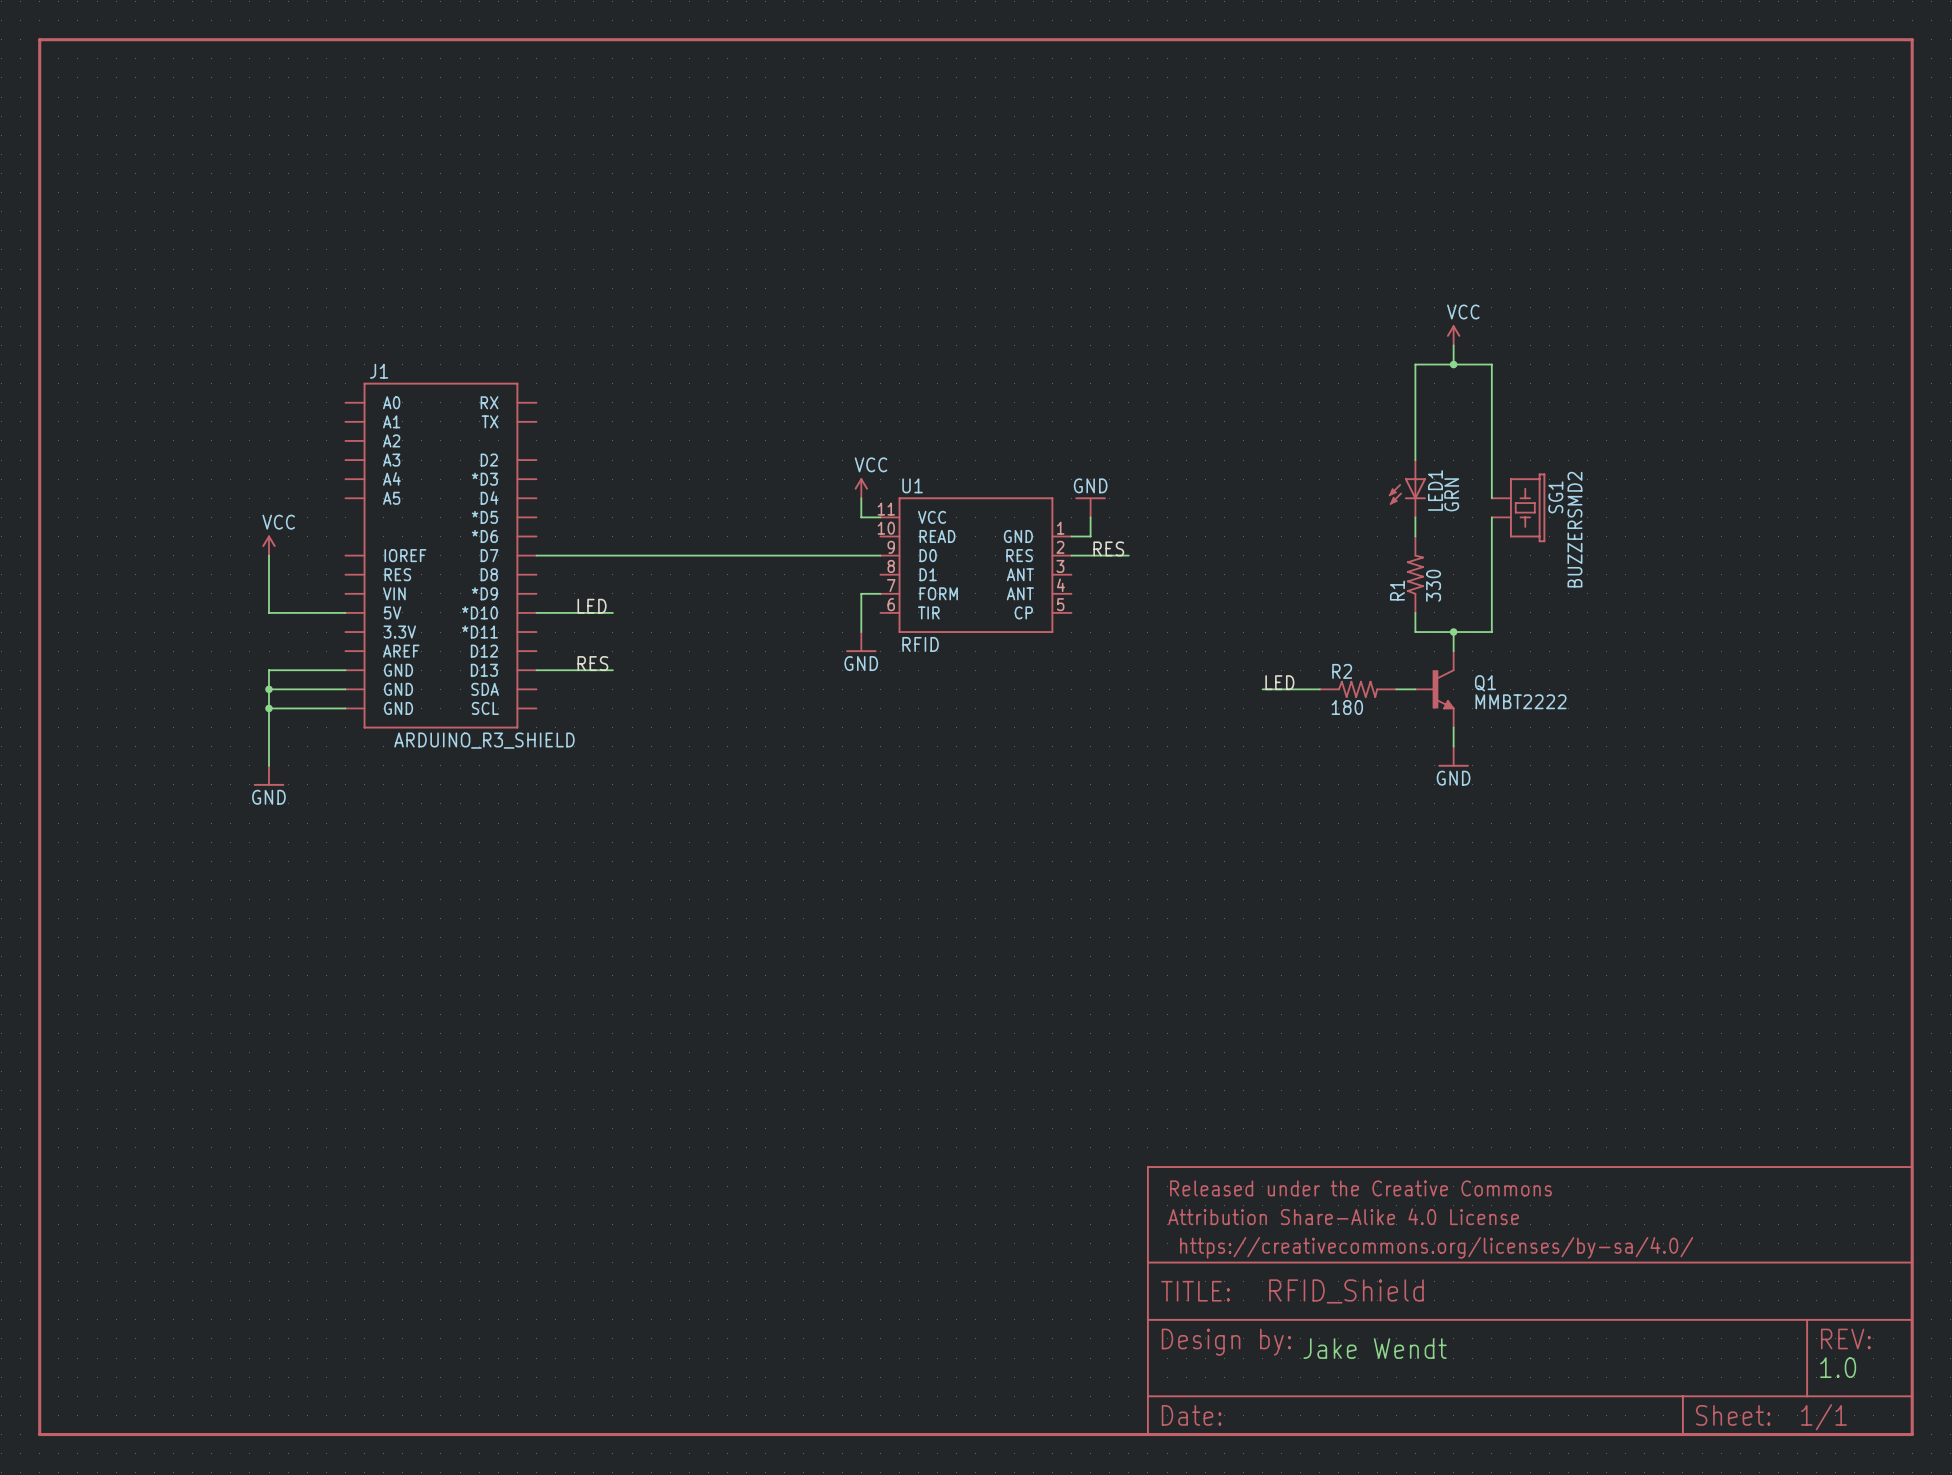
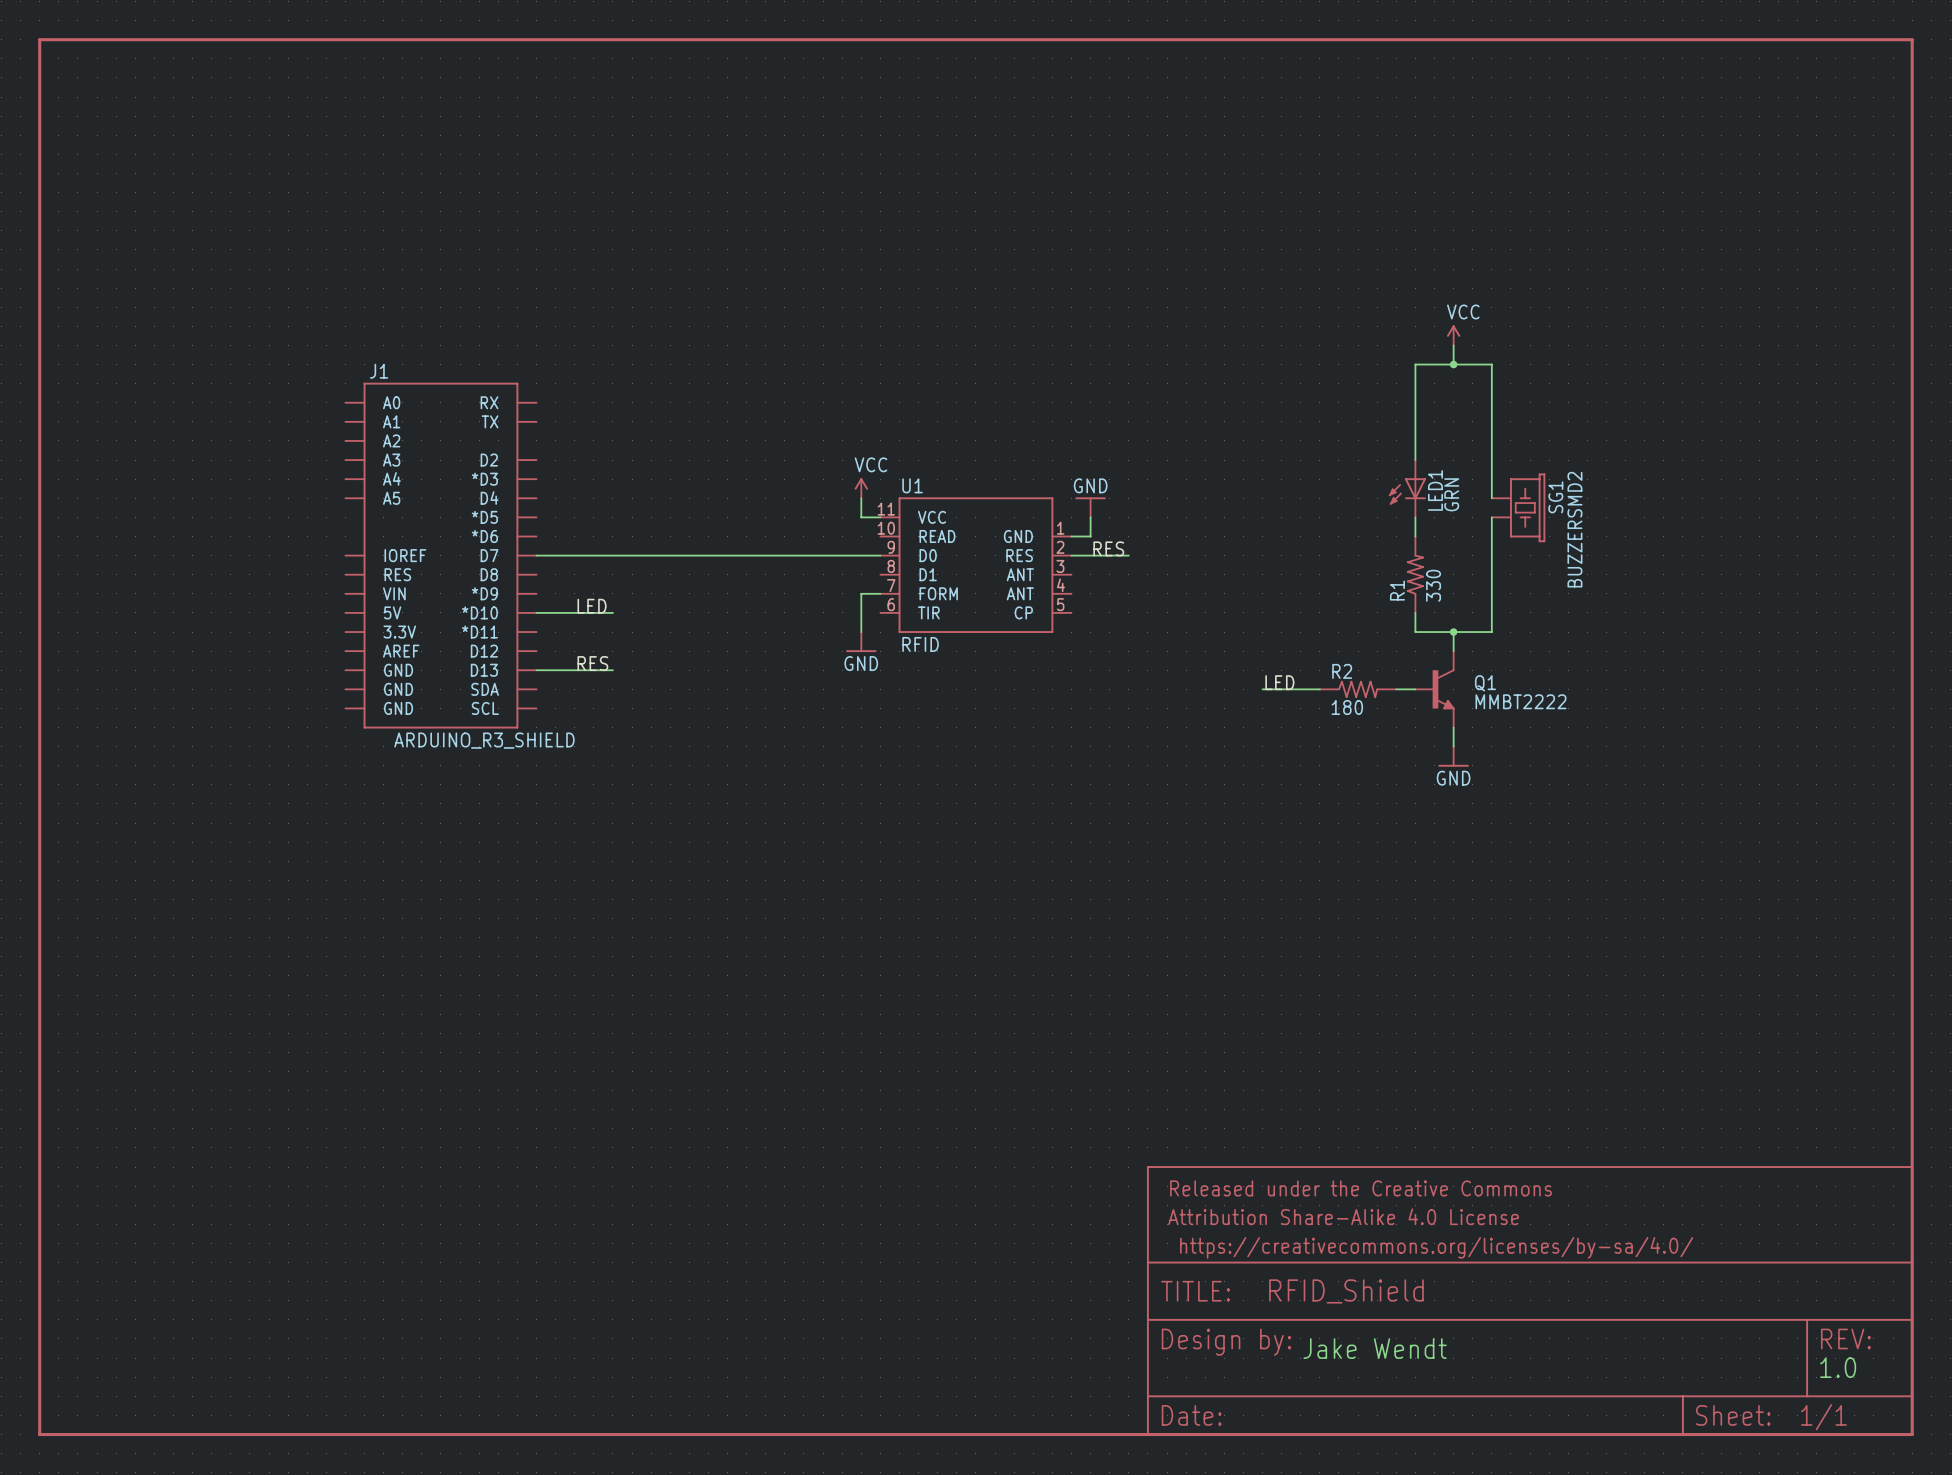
power symbol: VCC (269, 545) -> none
wire: (269, 555) (269, 612) (345, 612) -> none
wire: (345, 670) (269, 670) (269, 765) -> none
wire: (269, 689) (345, 689) -> none
junction: (269, 689) -> none
wire: (269, 708) (345, 708) -> none
junction: (269, 708) -> none
power symbol: GND (269, 775) -> none

